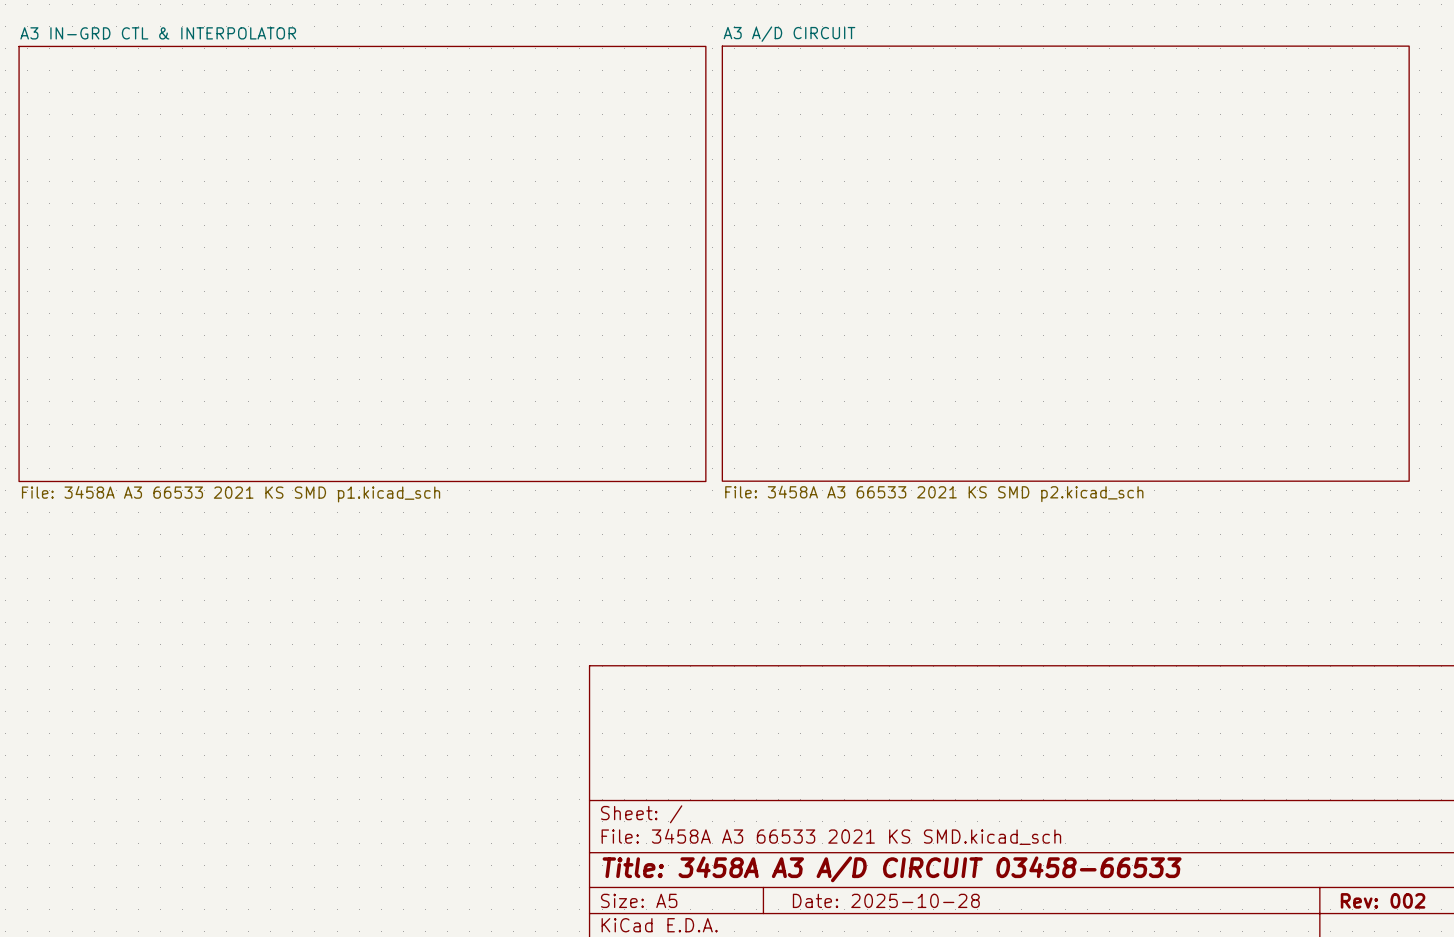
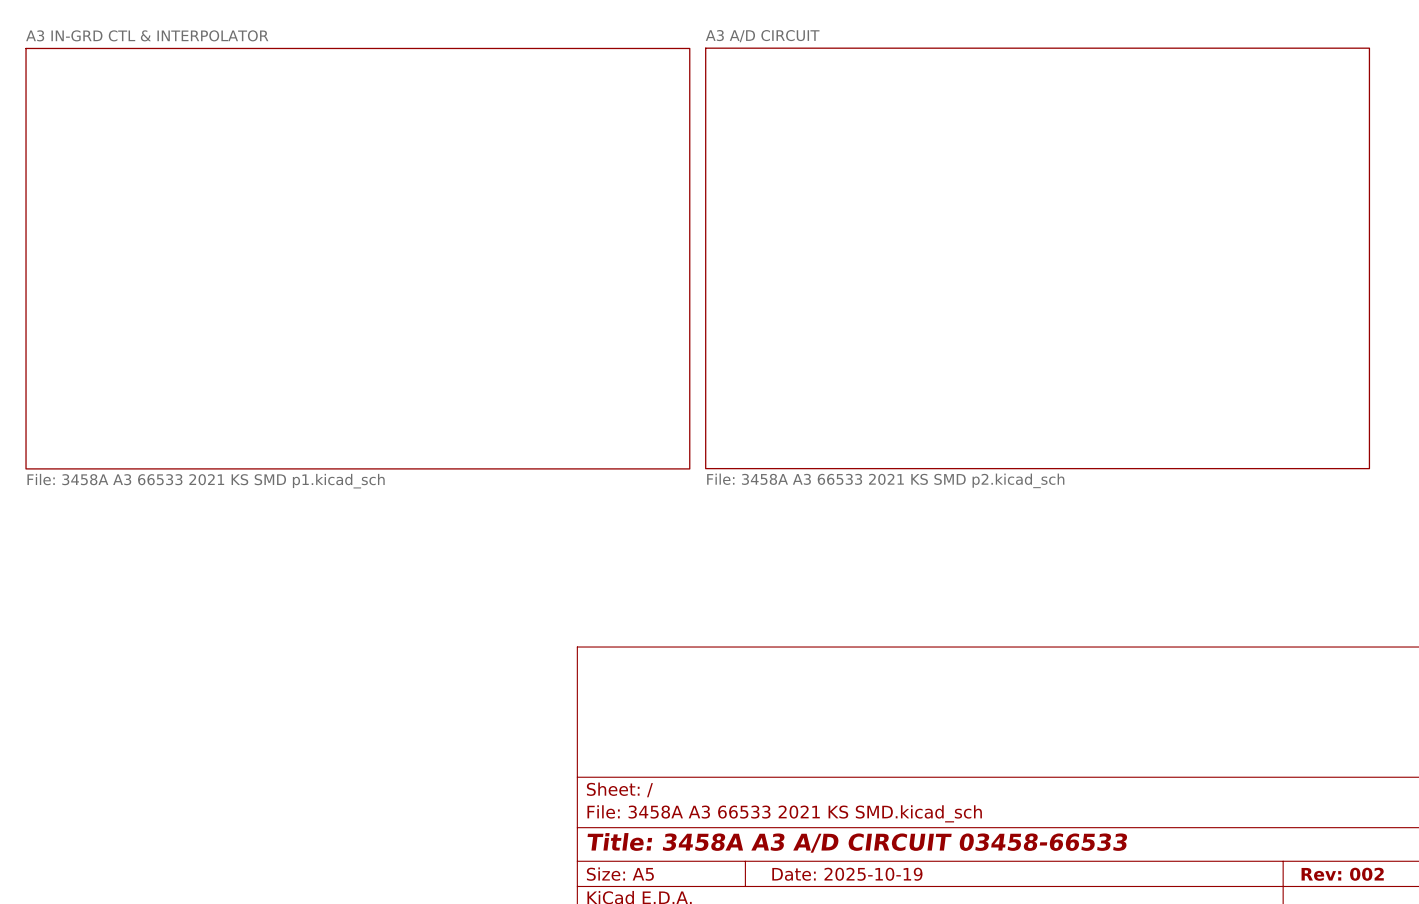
title block: Date: 2025-10-28 (886, 900) -> Date: 2025-10-19 (847, 874)

